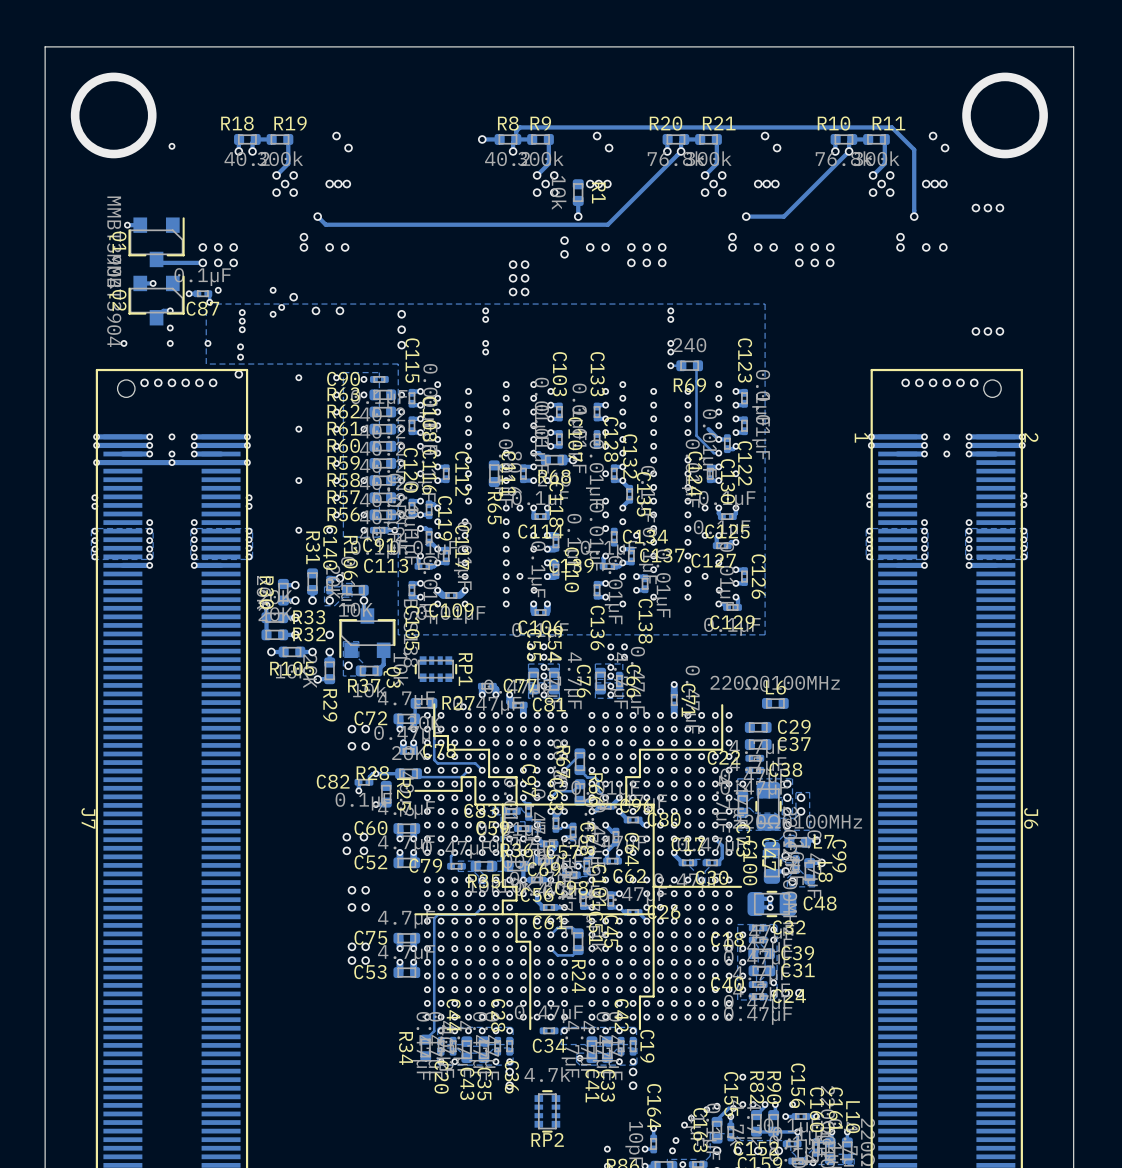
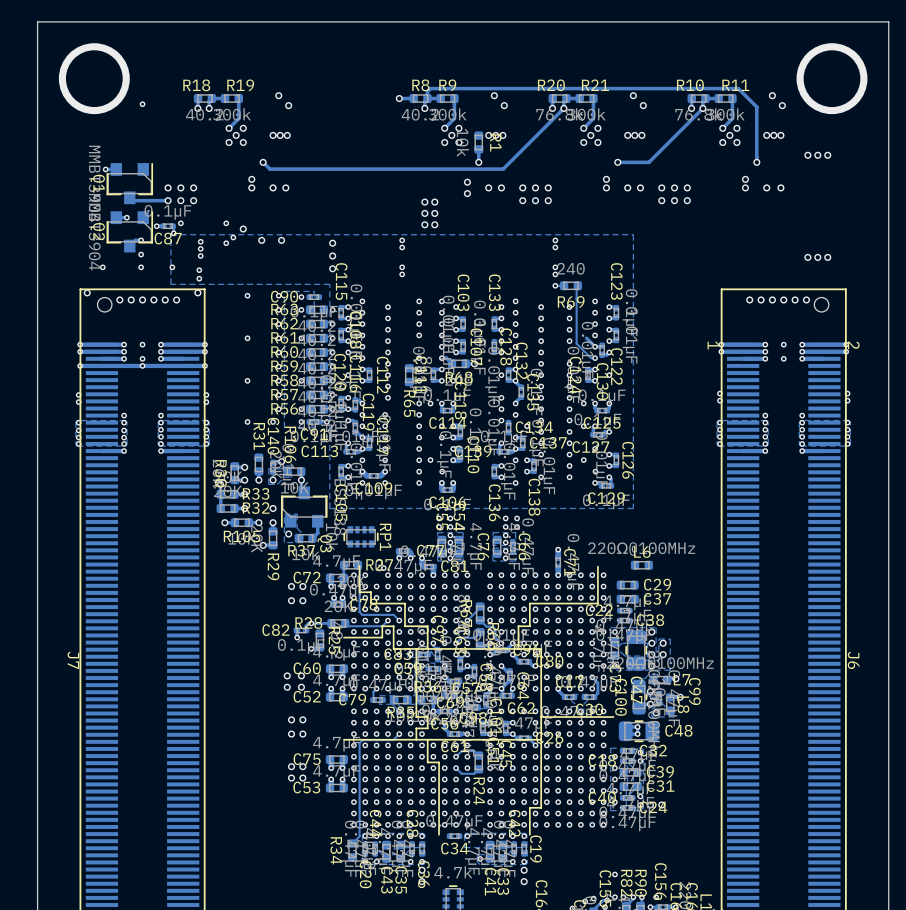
via: none -> (87, 292)

